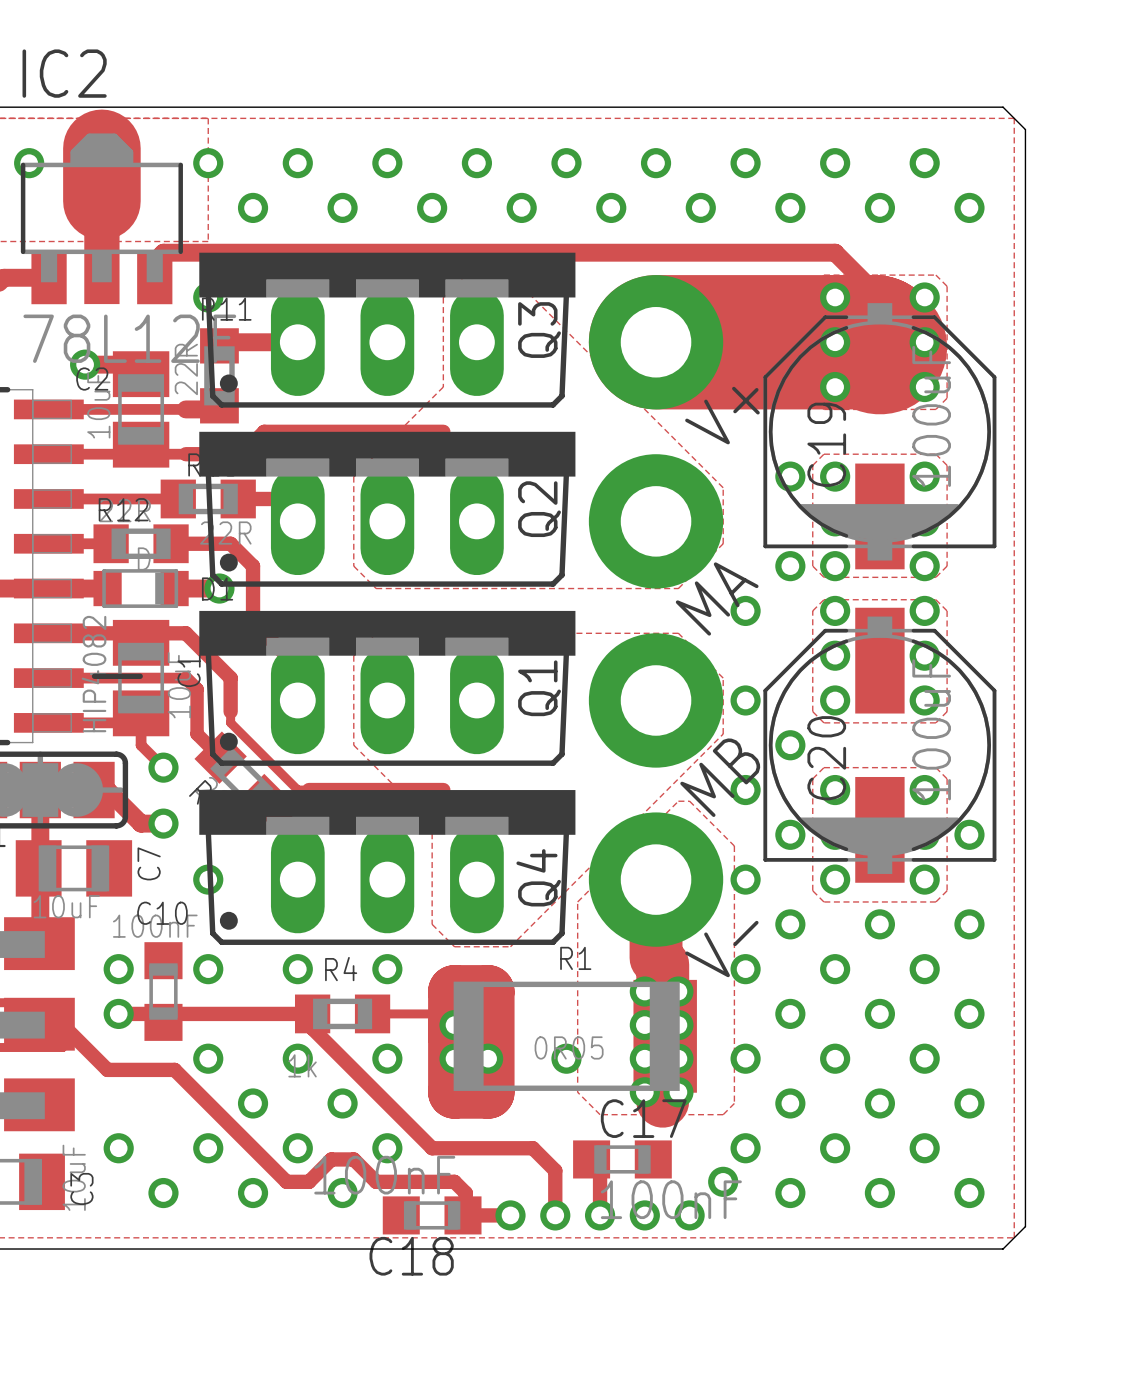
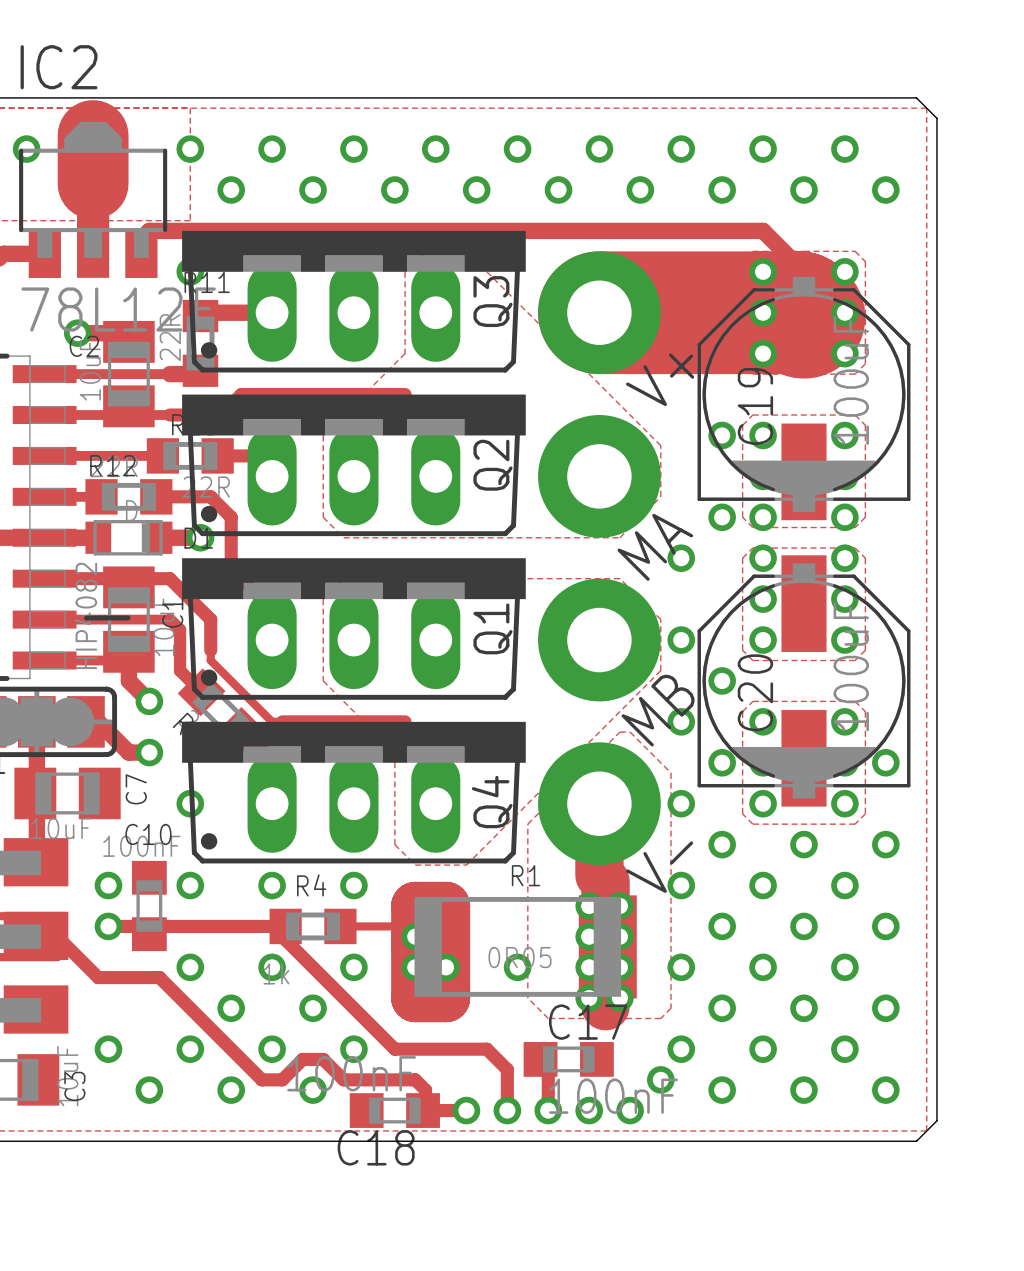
track width: thin (141, 722) (141, 745) (163, 767) -> thick (128, 660) (128, 680) (149, 701)

